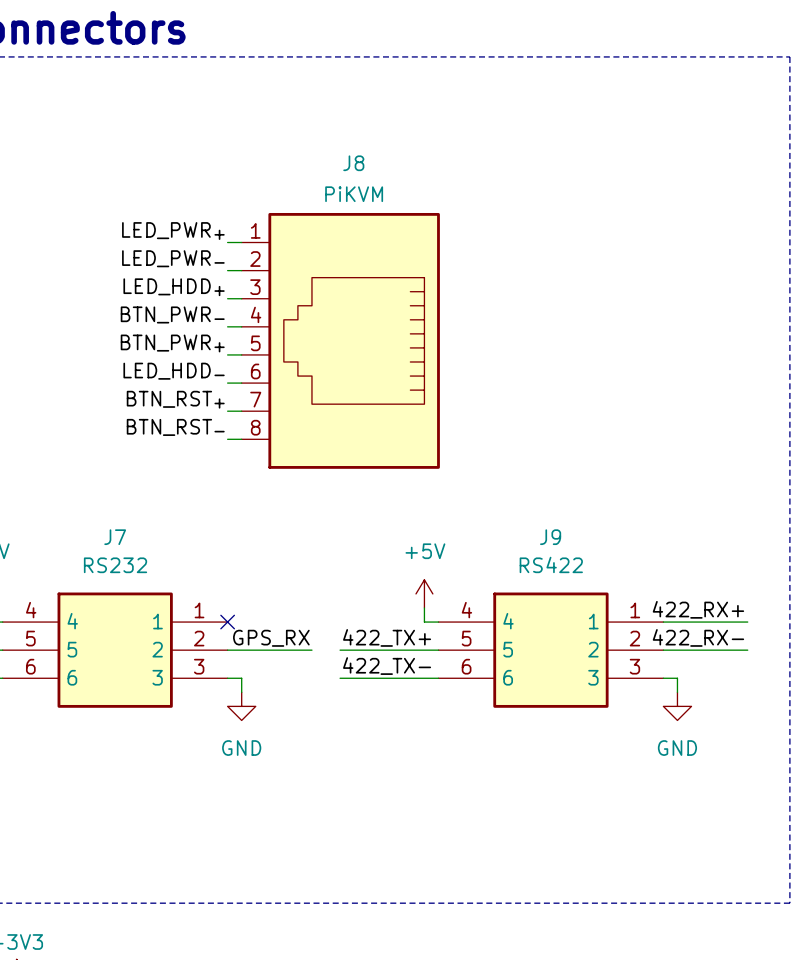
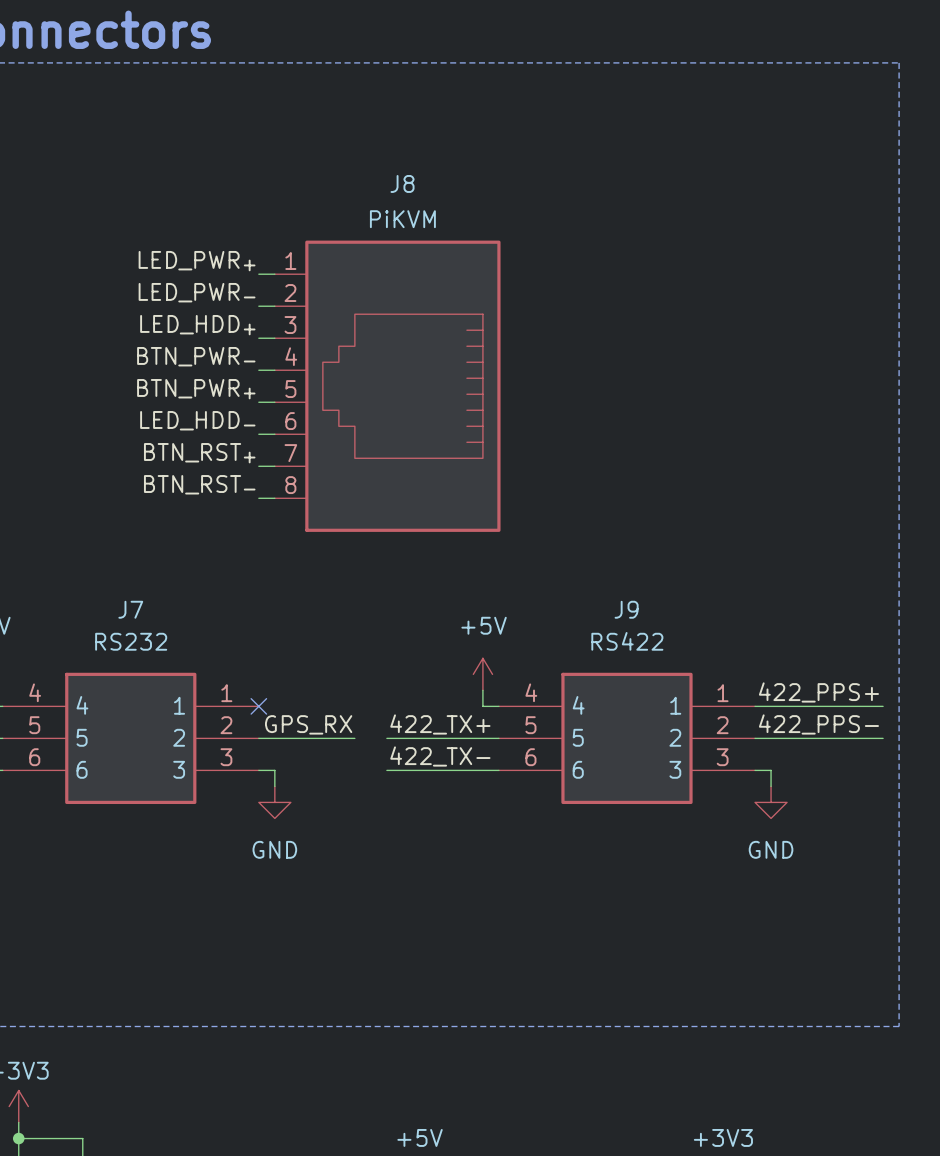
label: 422_RX+ (698, 609) -> 422_PPS+ (818, 692)
wire: none -> (851, 706) (883, 706)
label: 422_RX- (698, 637) -> 422_PPS- (818, 724)
wire: none -> (851, 738) (883, 738)

